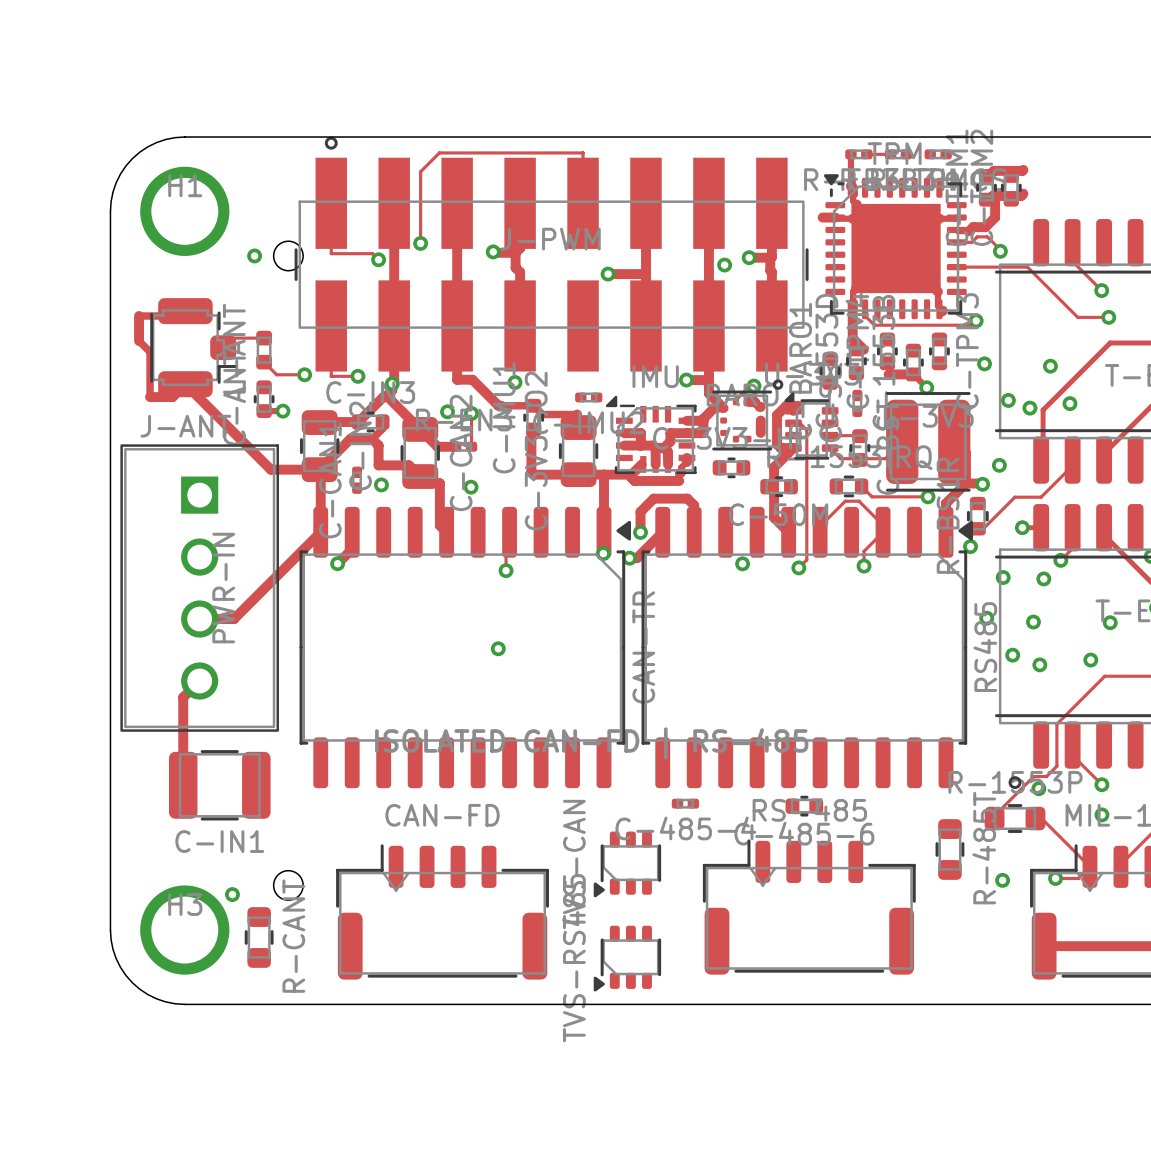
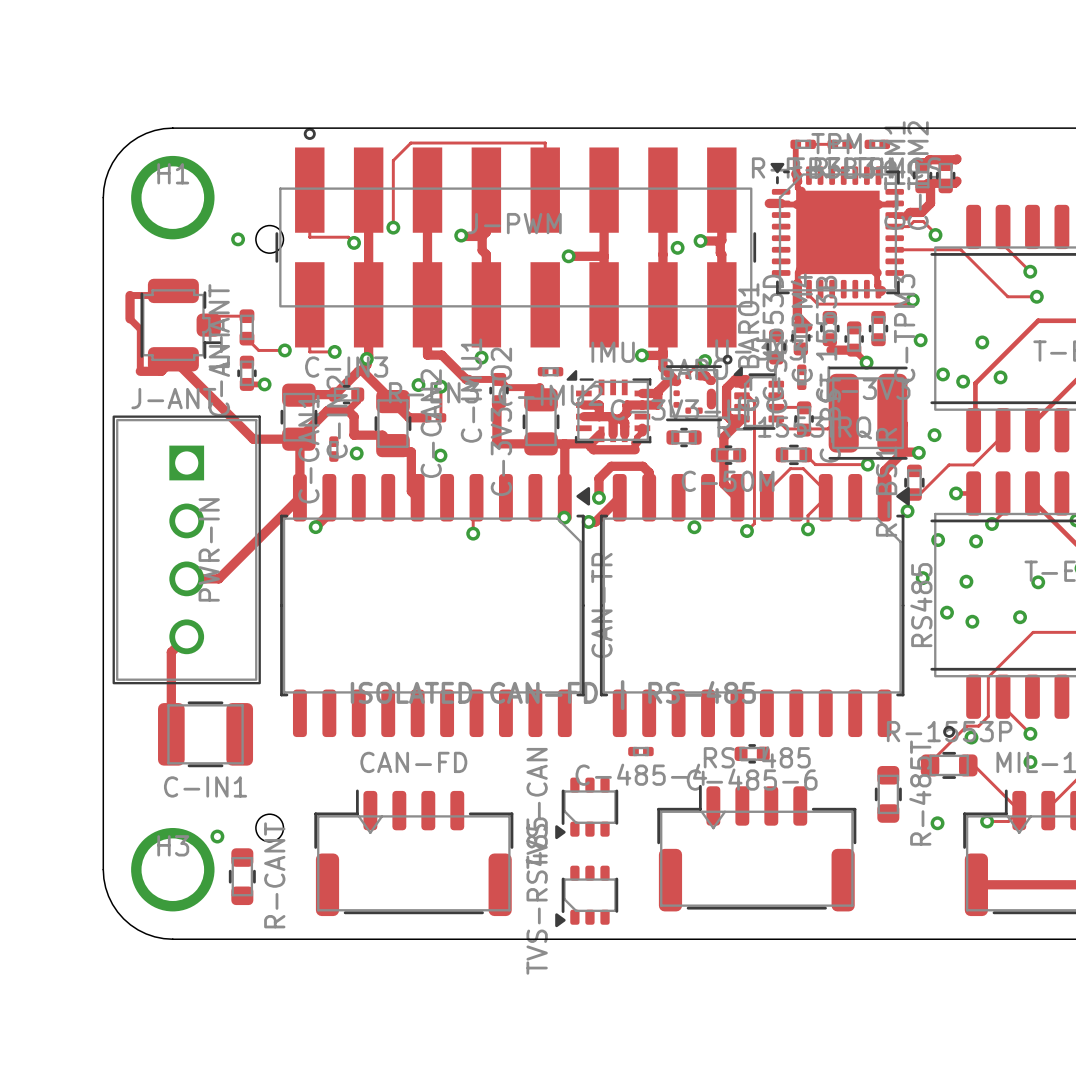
via: (498, 648) -> none

